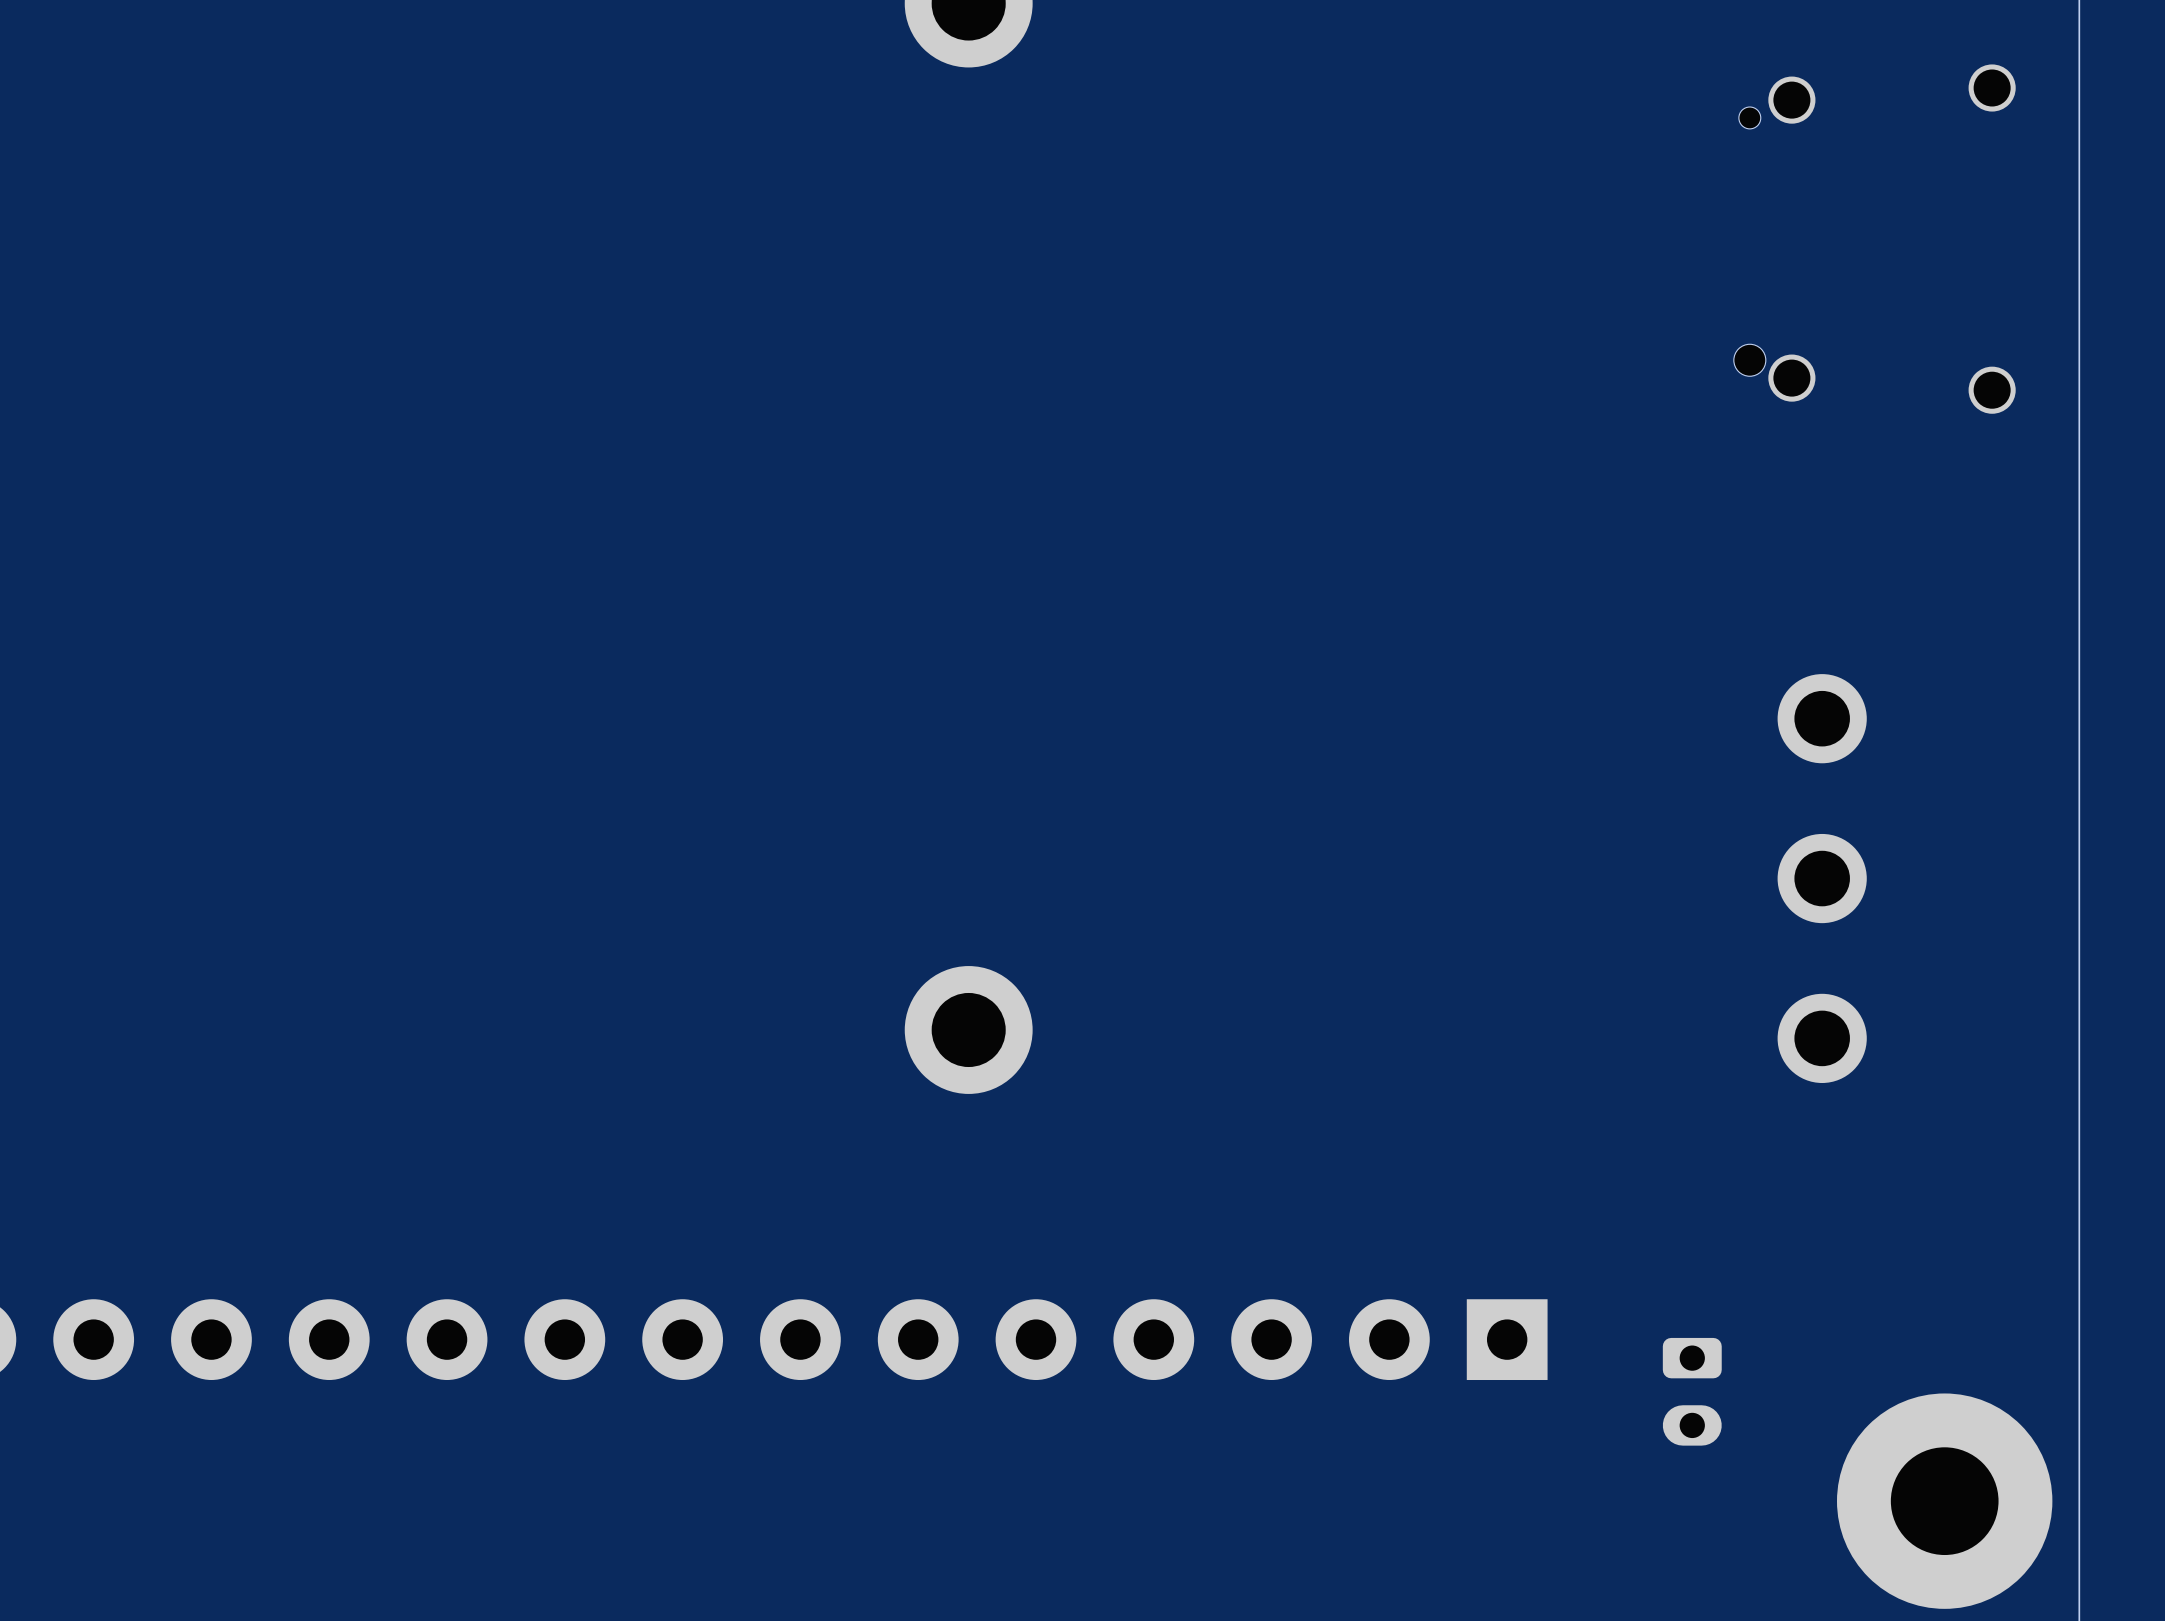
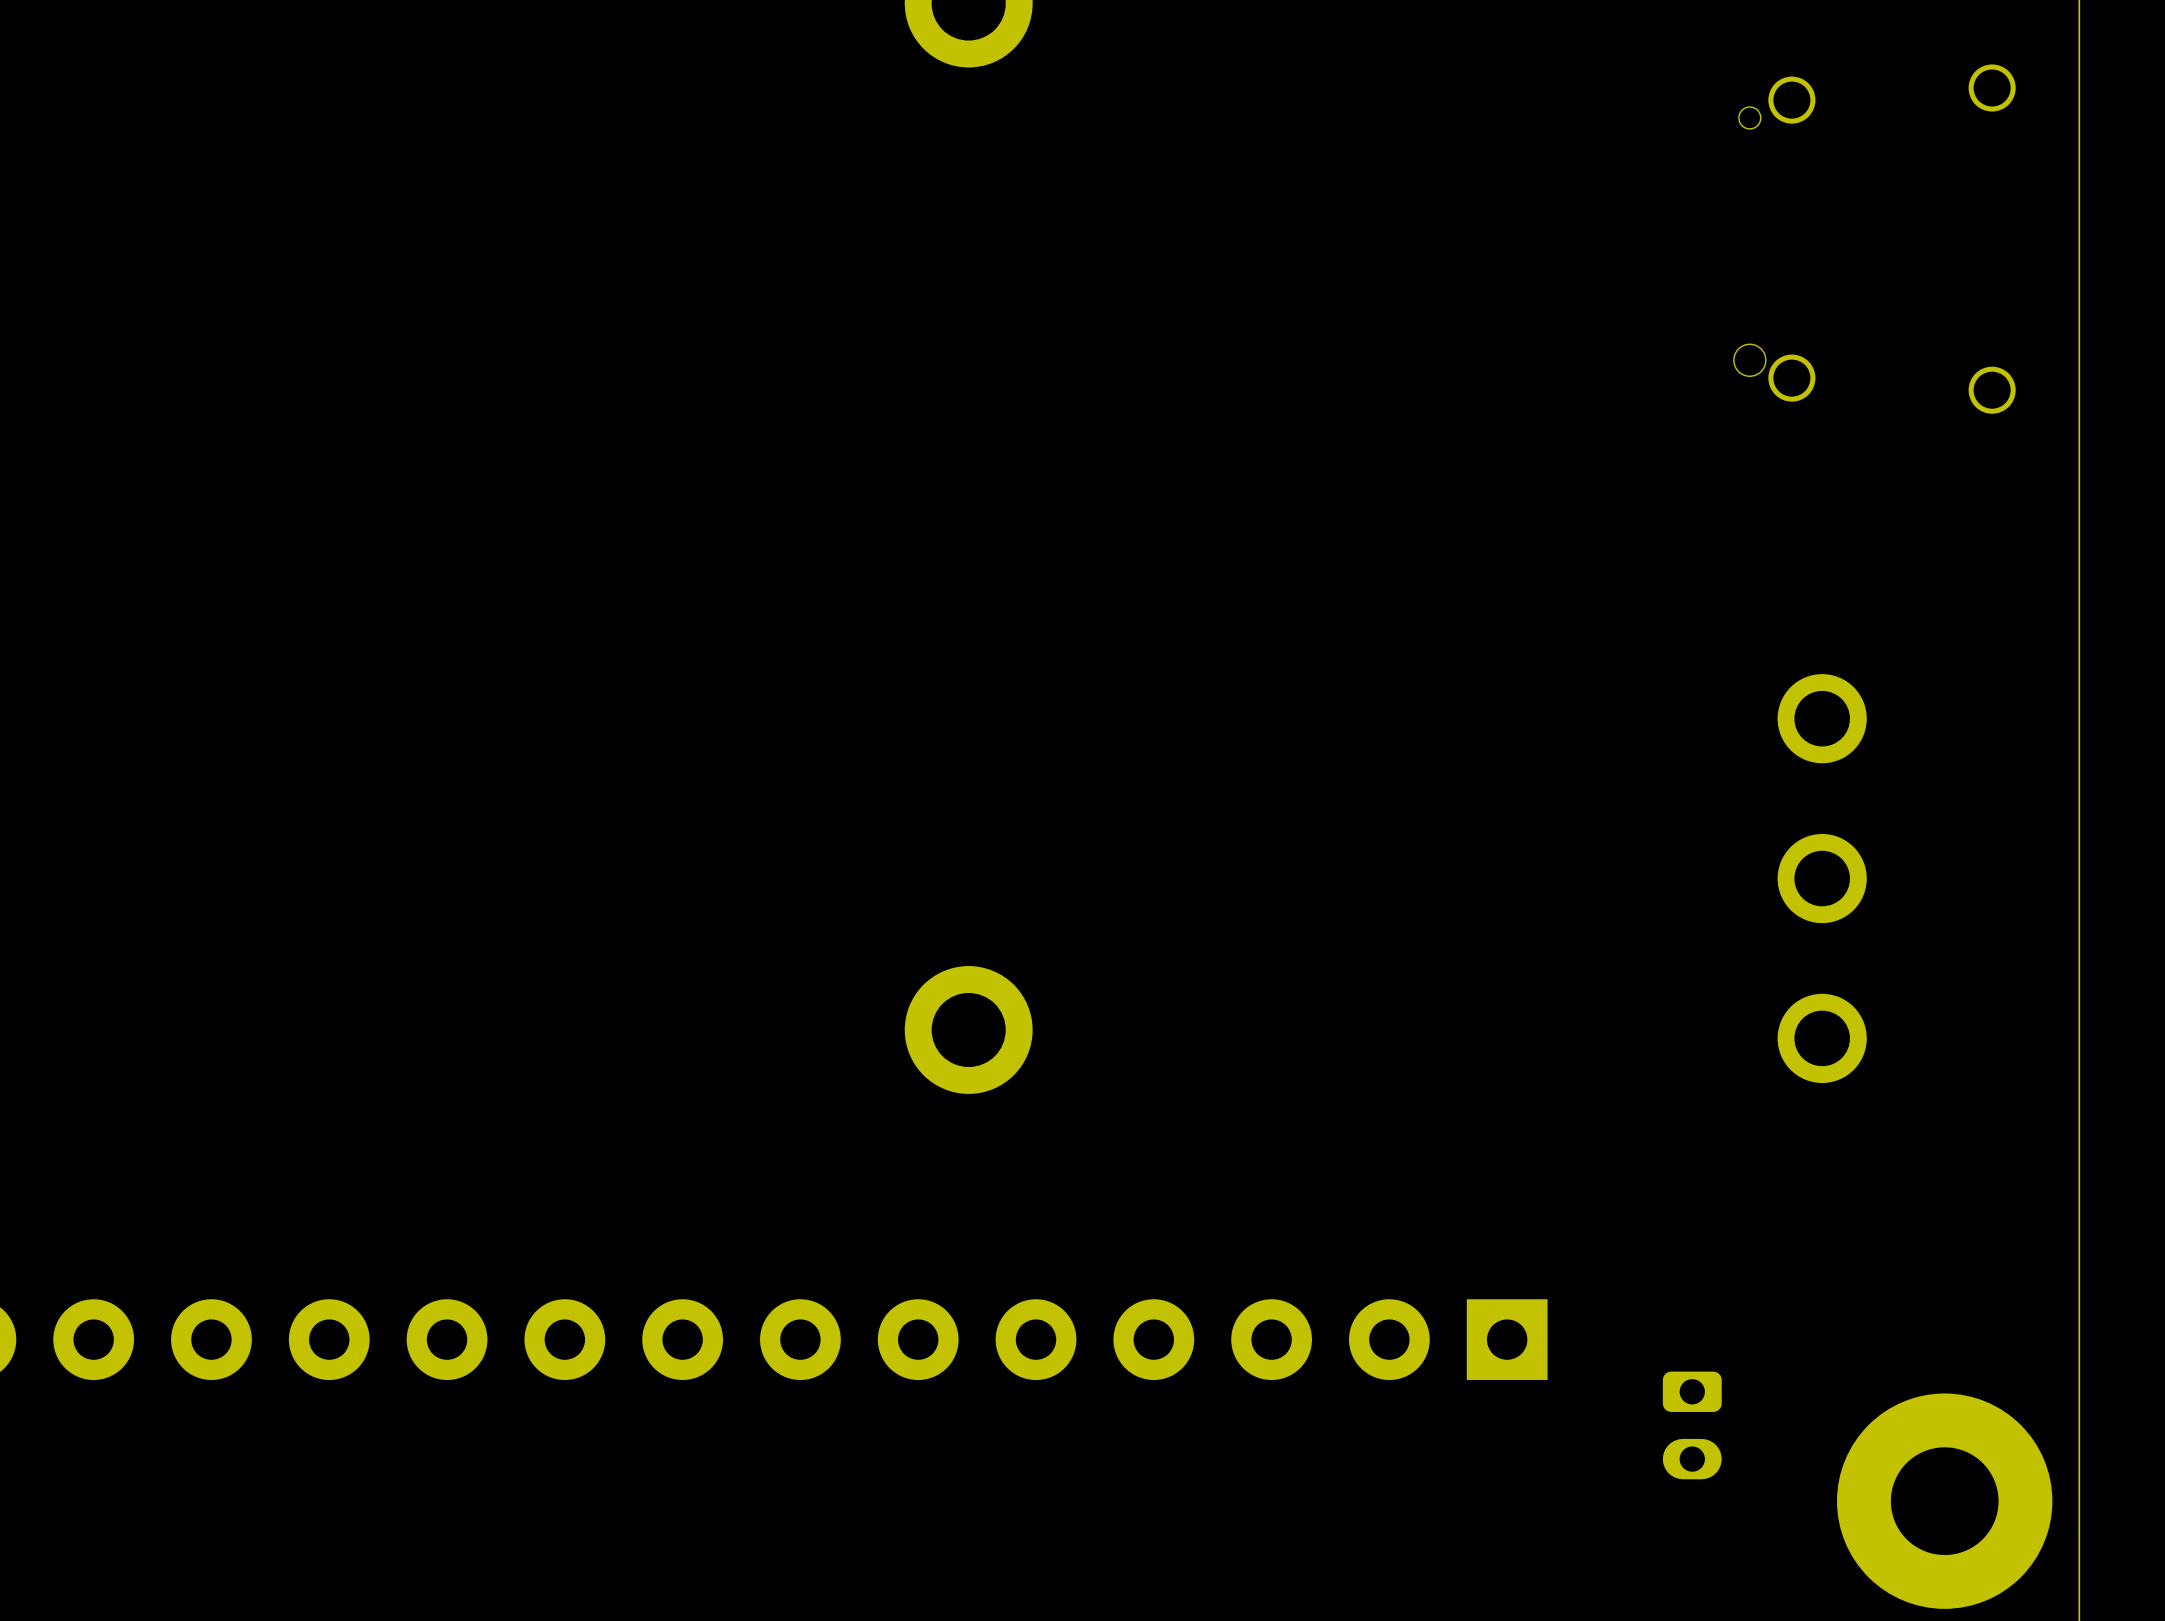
part position: (1692, 1391) -> (1692, 1425)

